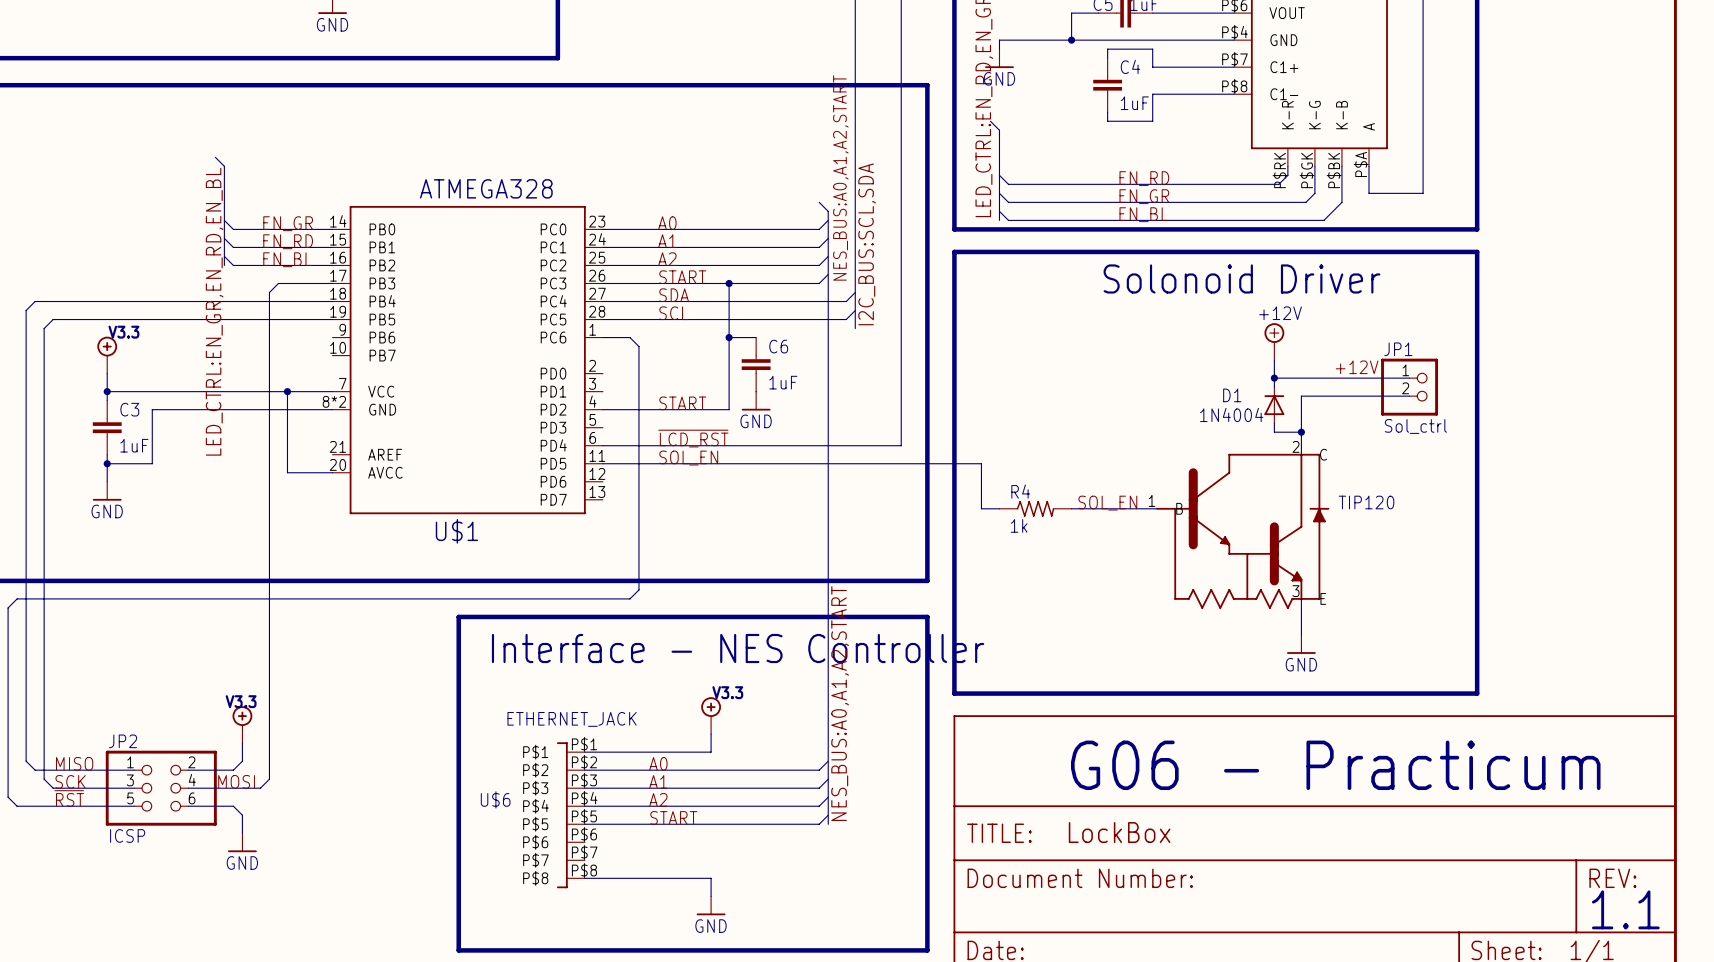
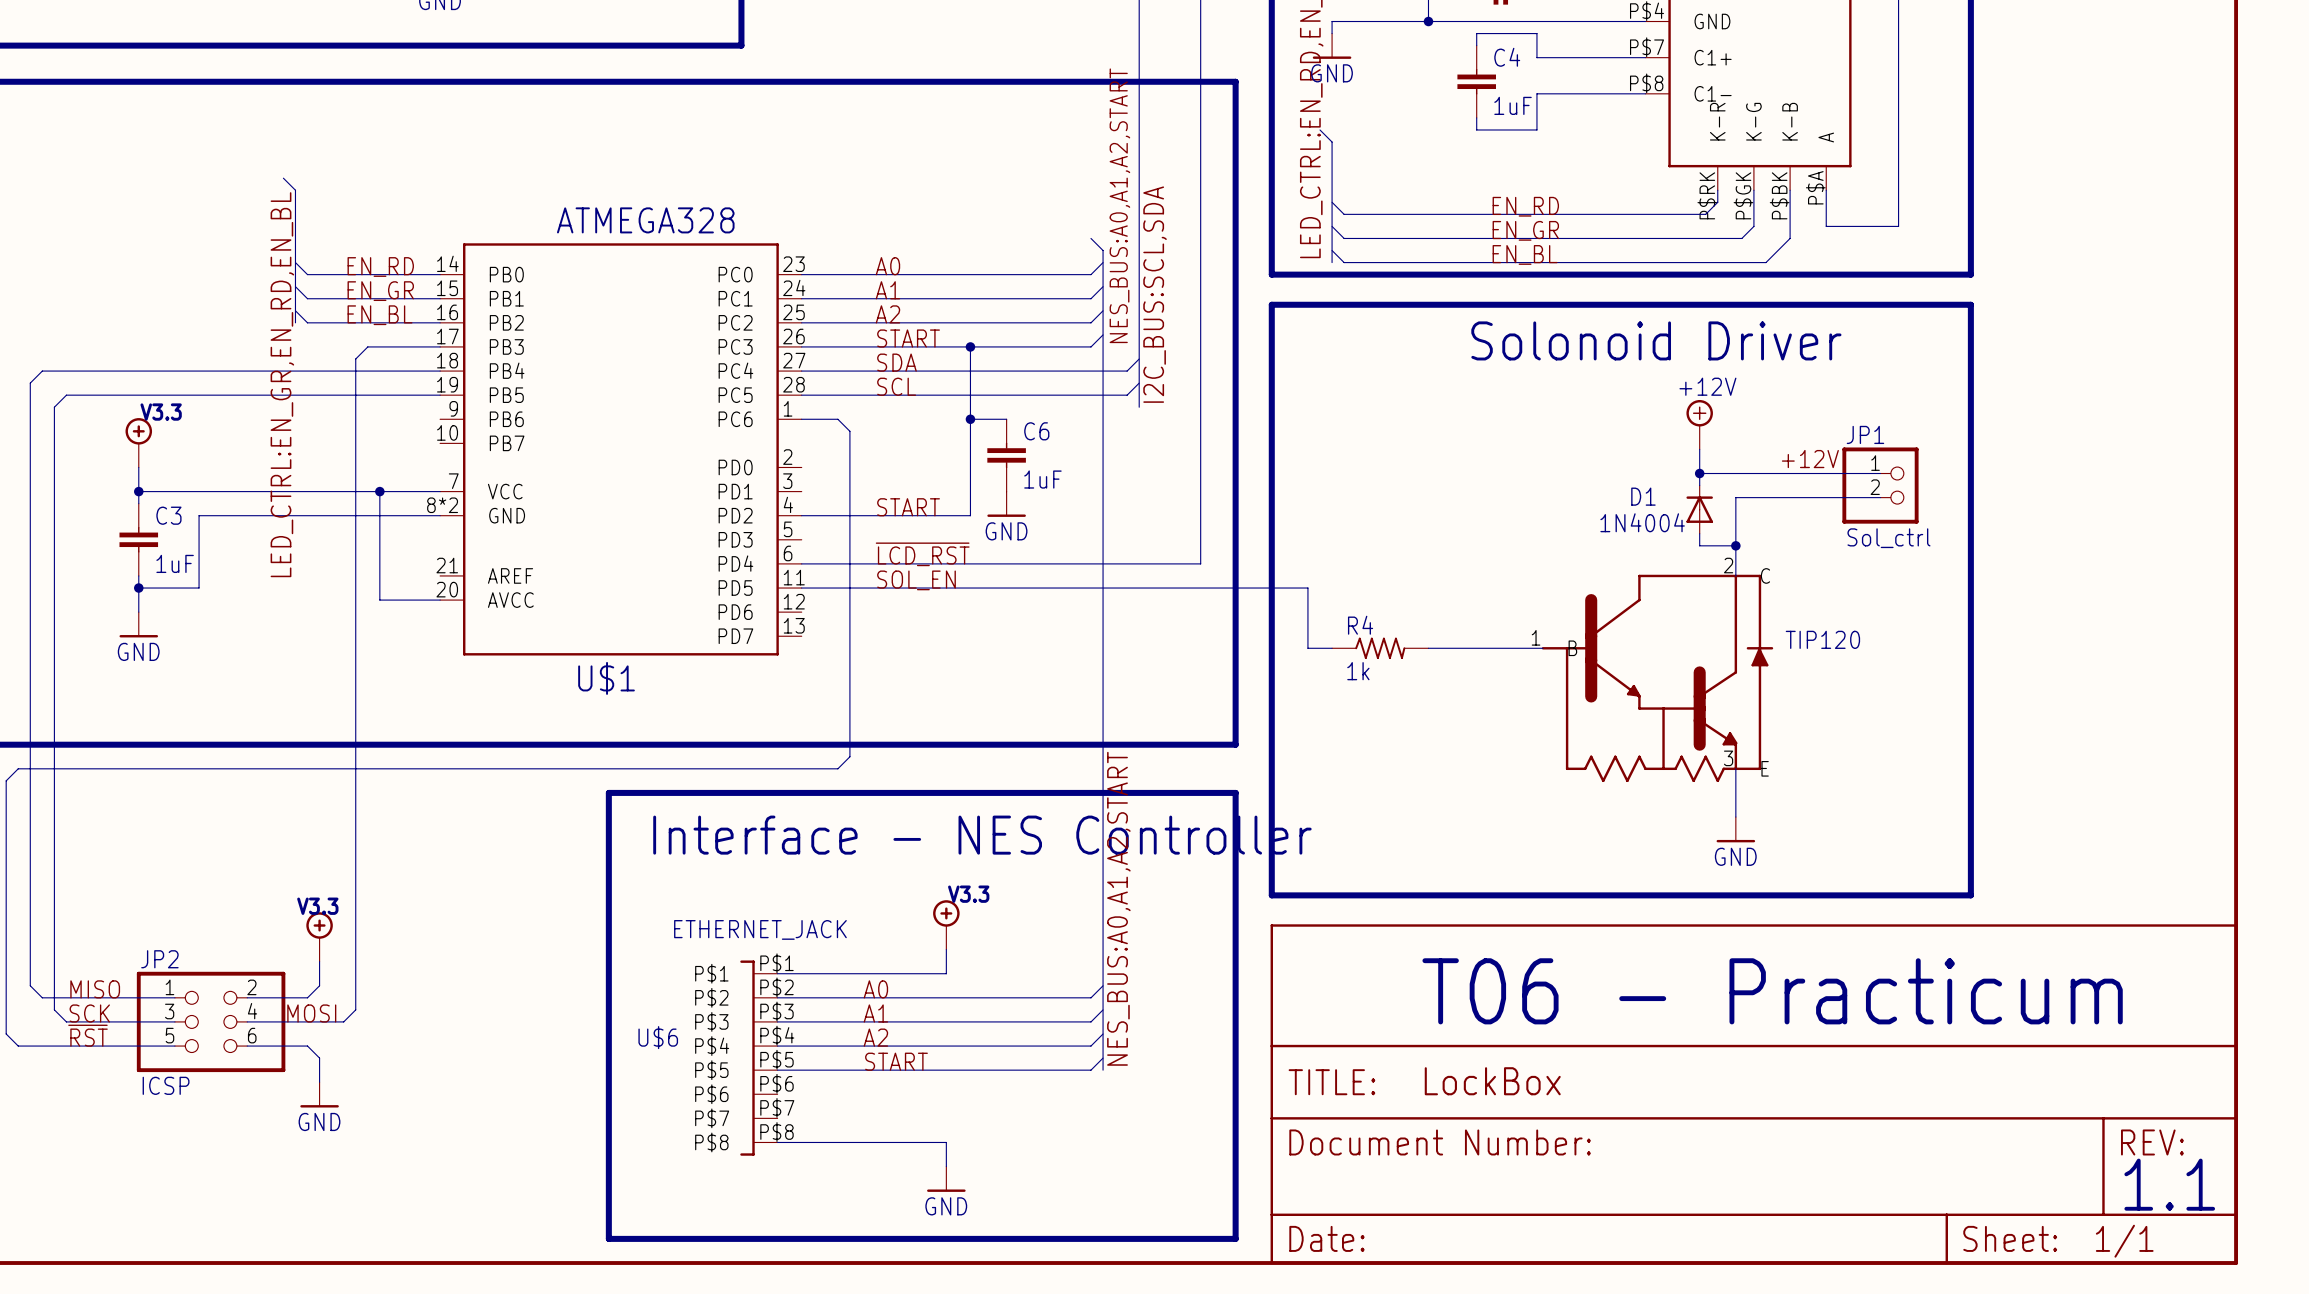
label: EN_GR (288, 223) -> EN_RD (380, 266)
label: EN_RD (288, 241) -> EN_GR (380, 291)
label: SOL_EN (1107, 503) -> none
text: G06 - Practicum (1335, 765) -> T06 - Practicum (1772, 991)

